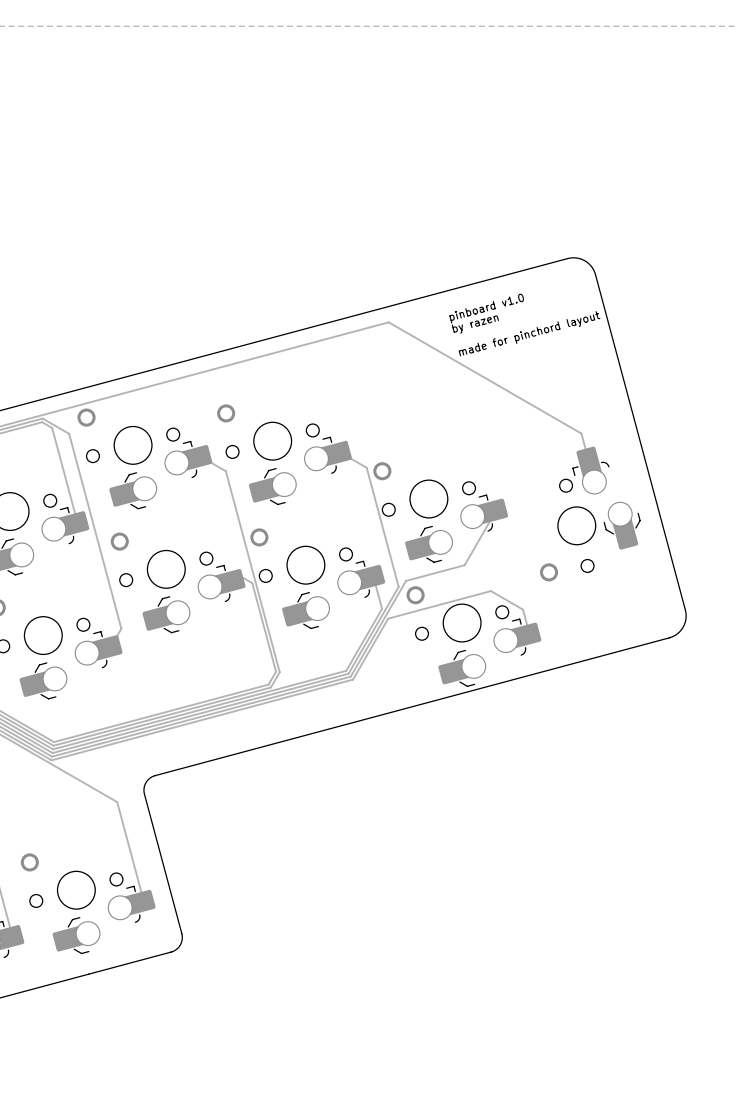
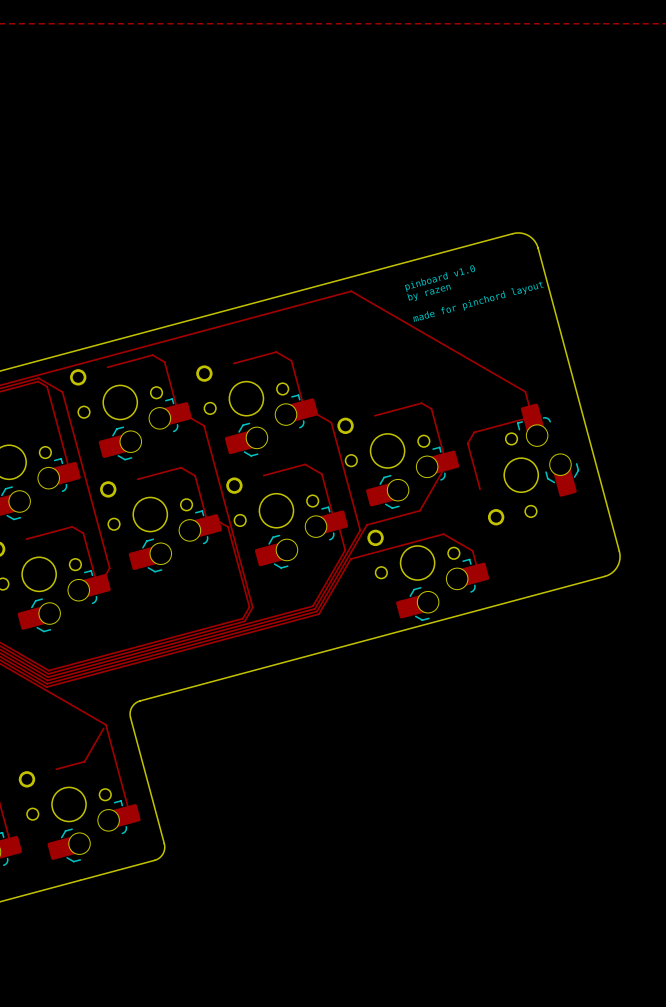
track: none -> (233, 363) (276, 352) (291, 360) (305, 412)
track: none -> (107, 367) (152, 355) (164, 362) (179, 416)
track: none -> (374, 415) (421, 403) (431, 408) (446, 464)
track: none -> (529, 417) (474, 432) (467, 443) (480, 489)
track: none -> (263, 475) (305, 464) (321, 474) (335, 524)
track: none -> (137, 479) (181, 467) (195, 475) (209, 528)
track: none -> (26, 539) (72, 526) (83, 533) (98, 588)
track: none -> (103, 728) (84, 761) (56, 769)

